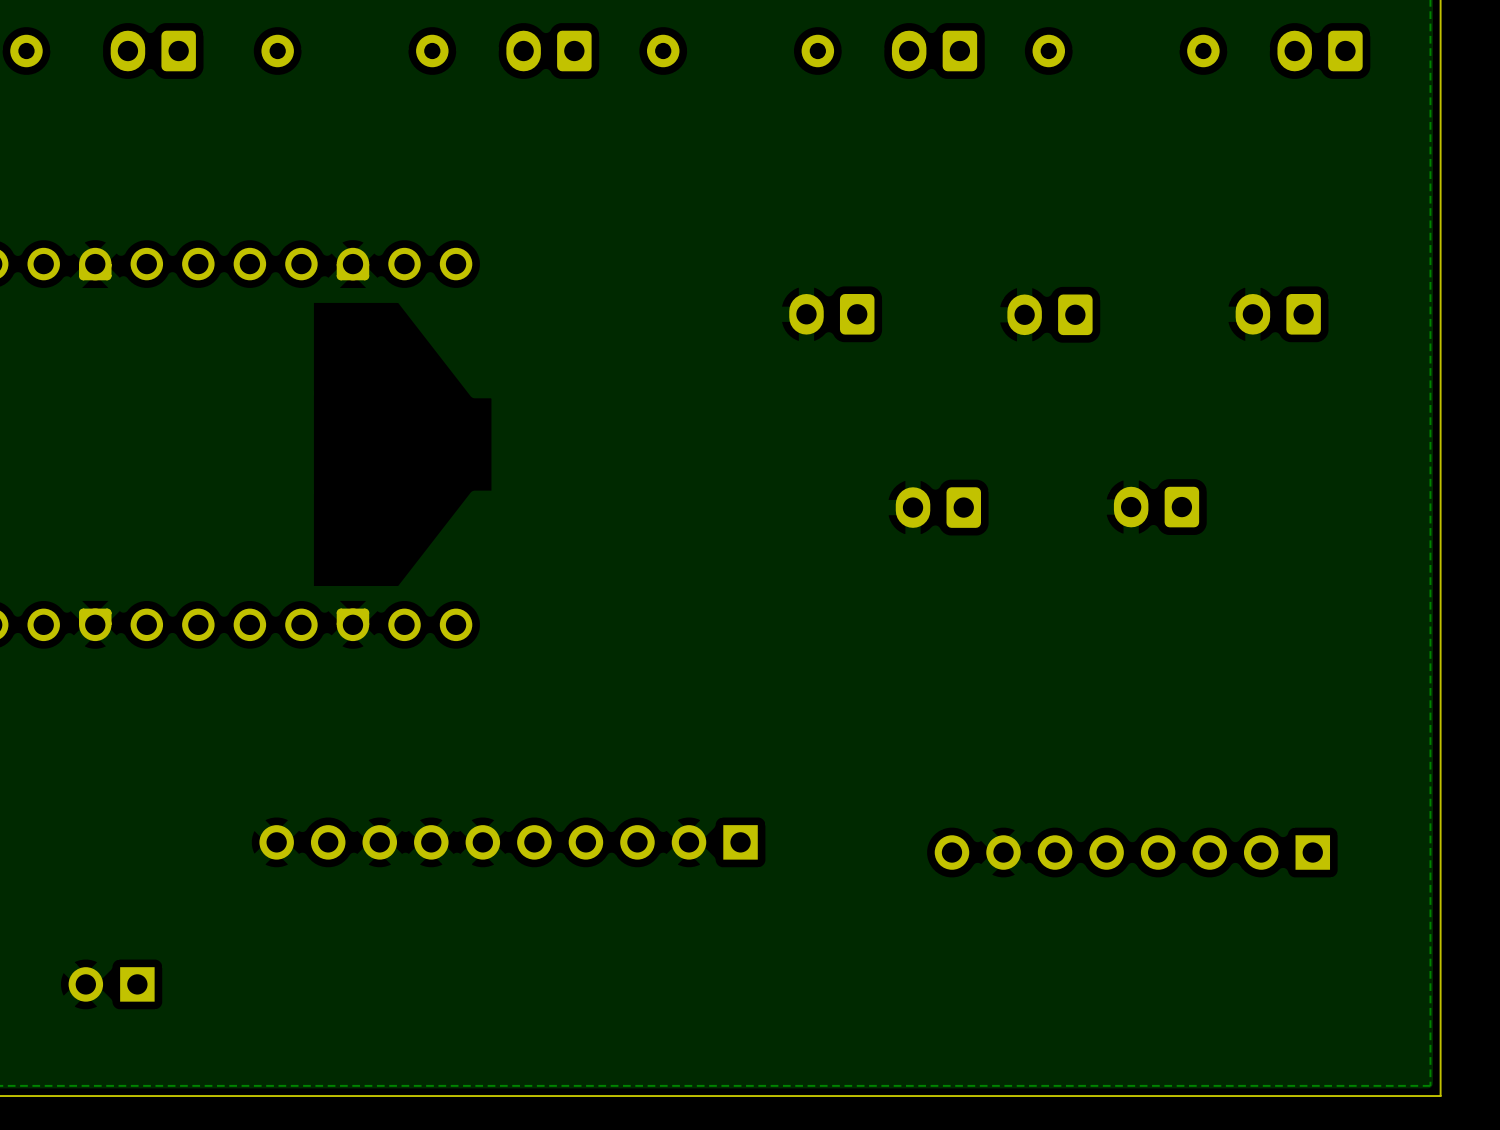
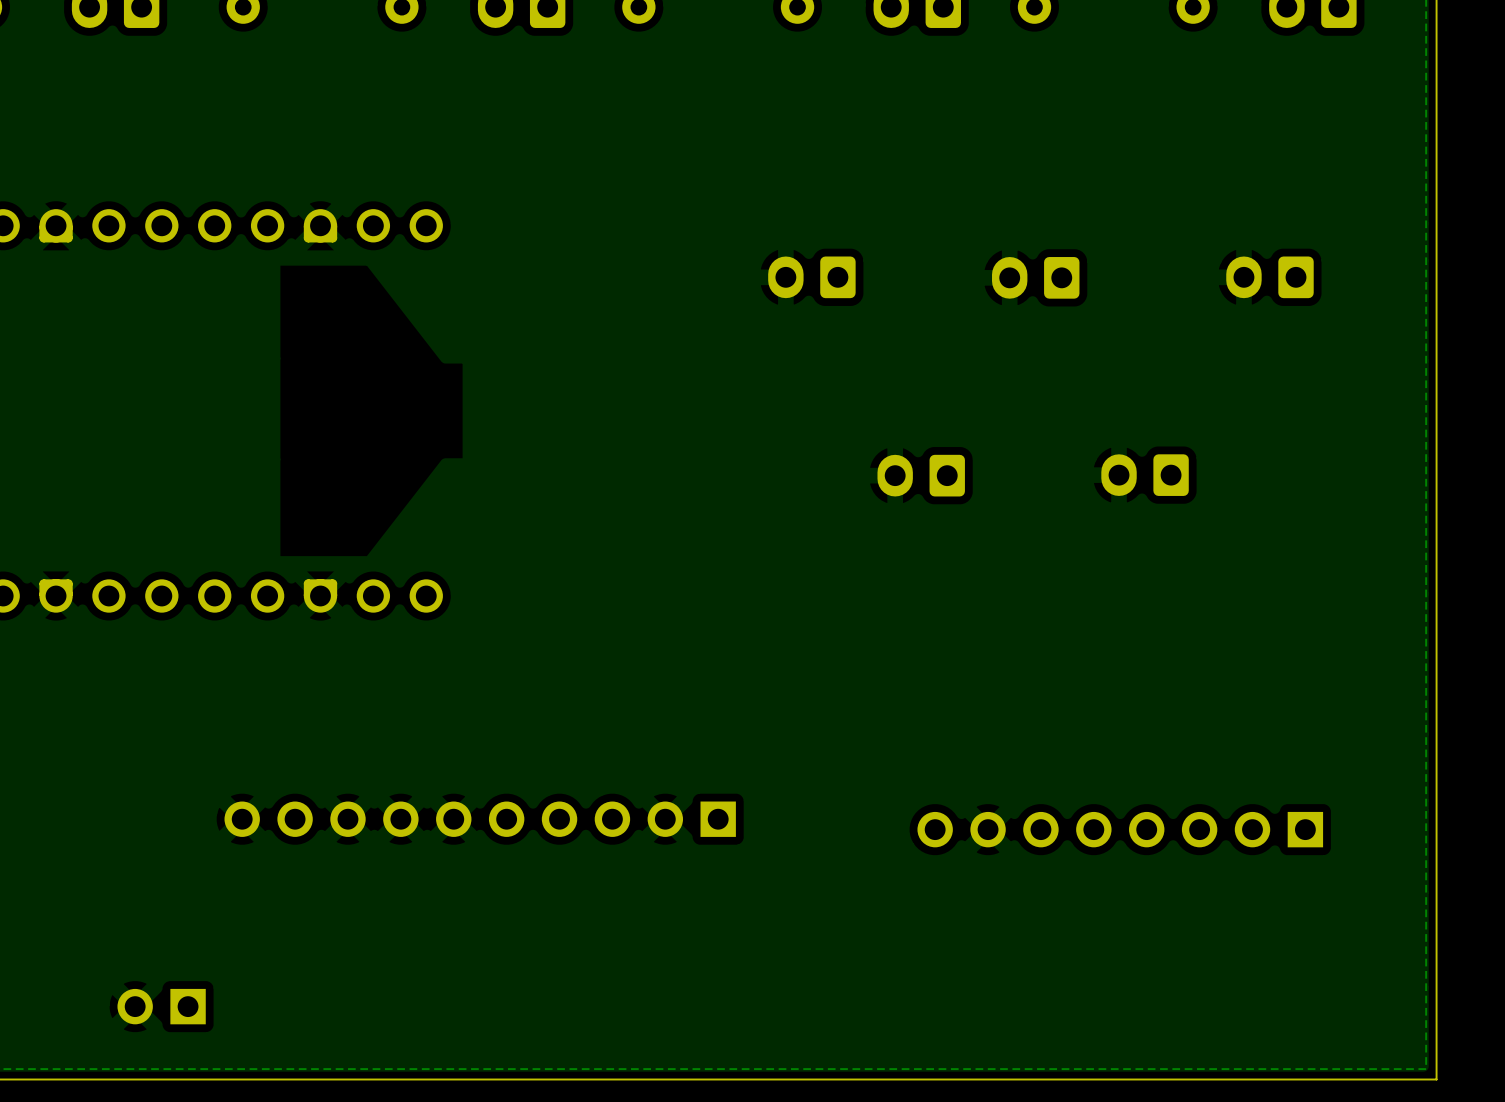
part position: (111, 984) -> (161, 1006)

